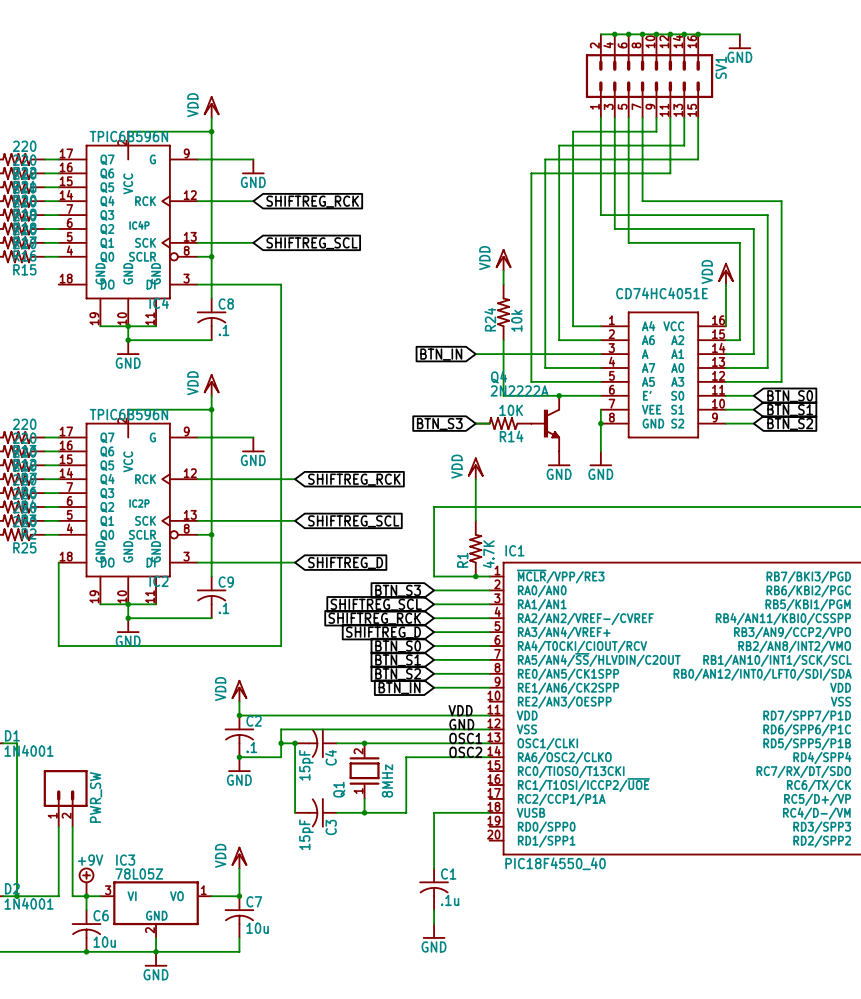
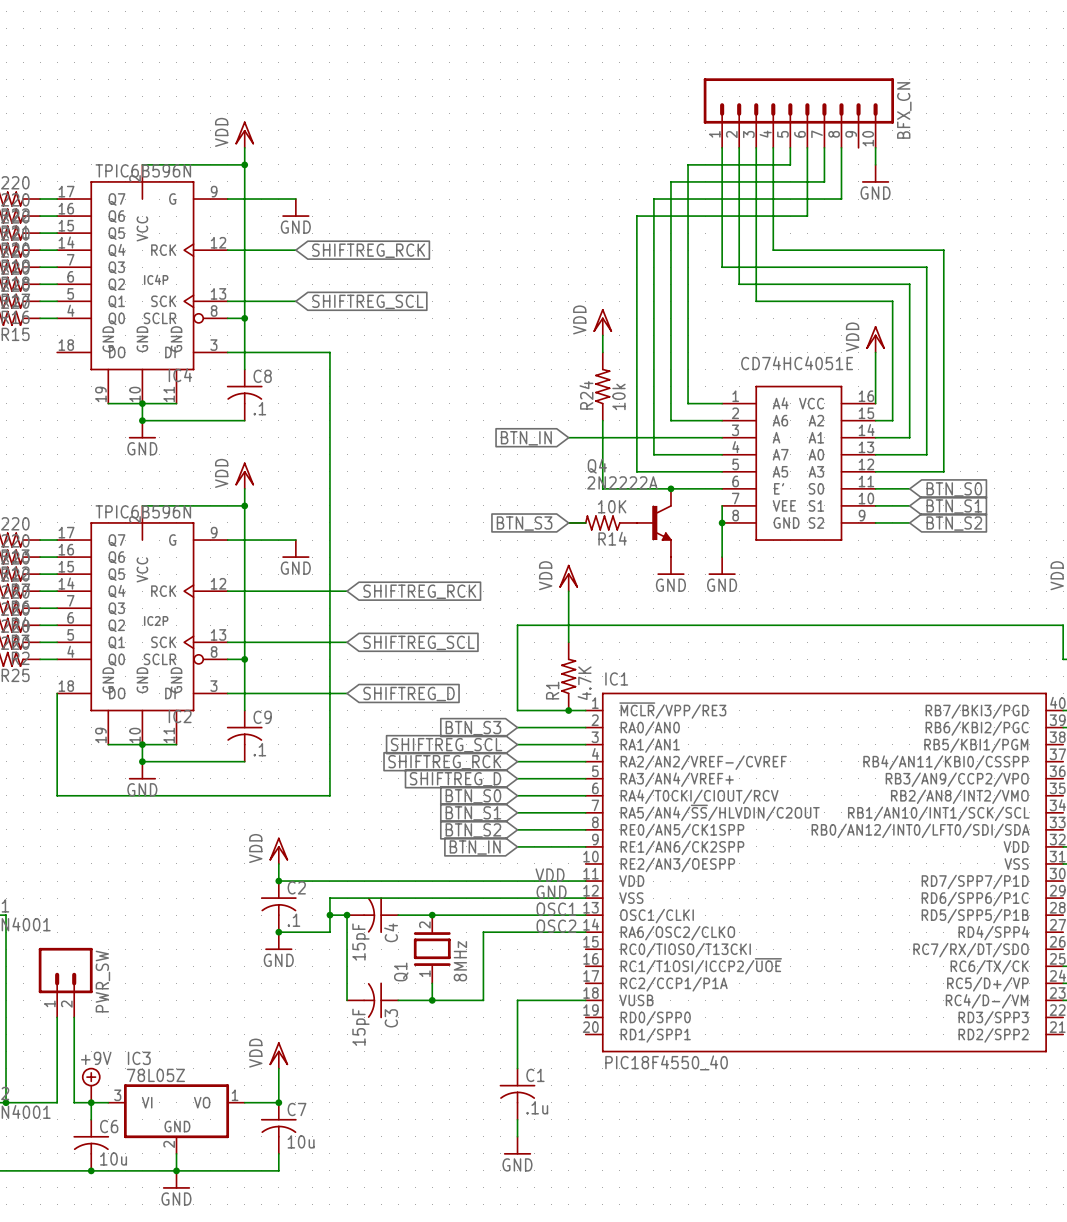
wire: (600, 34) (739, 34) -> none
junction: (614, 34) -> none
junction: (628, 34) -> none
junction: (642, 34) -> none
junction: (656, 34) -> none
junction: (670, 34) -> none
junction: (684, 34) -> none
junction: (698, 34) -> none
power symbol position: GND (739, 41) -> GND (875, 173)
SV1: (649, 76) -> none
BFX_CN: none -> (798, 113)
wire: none -> (875, 147) (875, 164)

